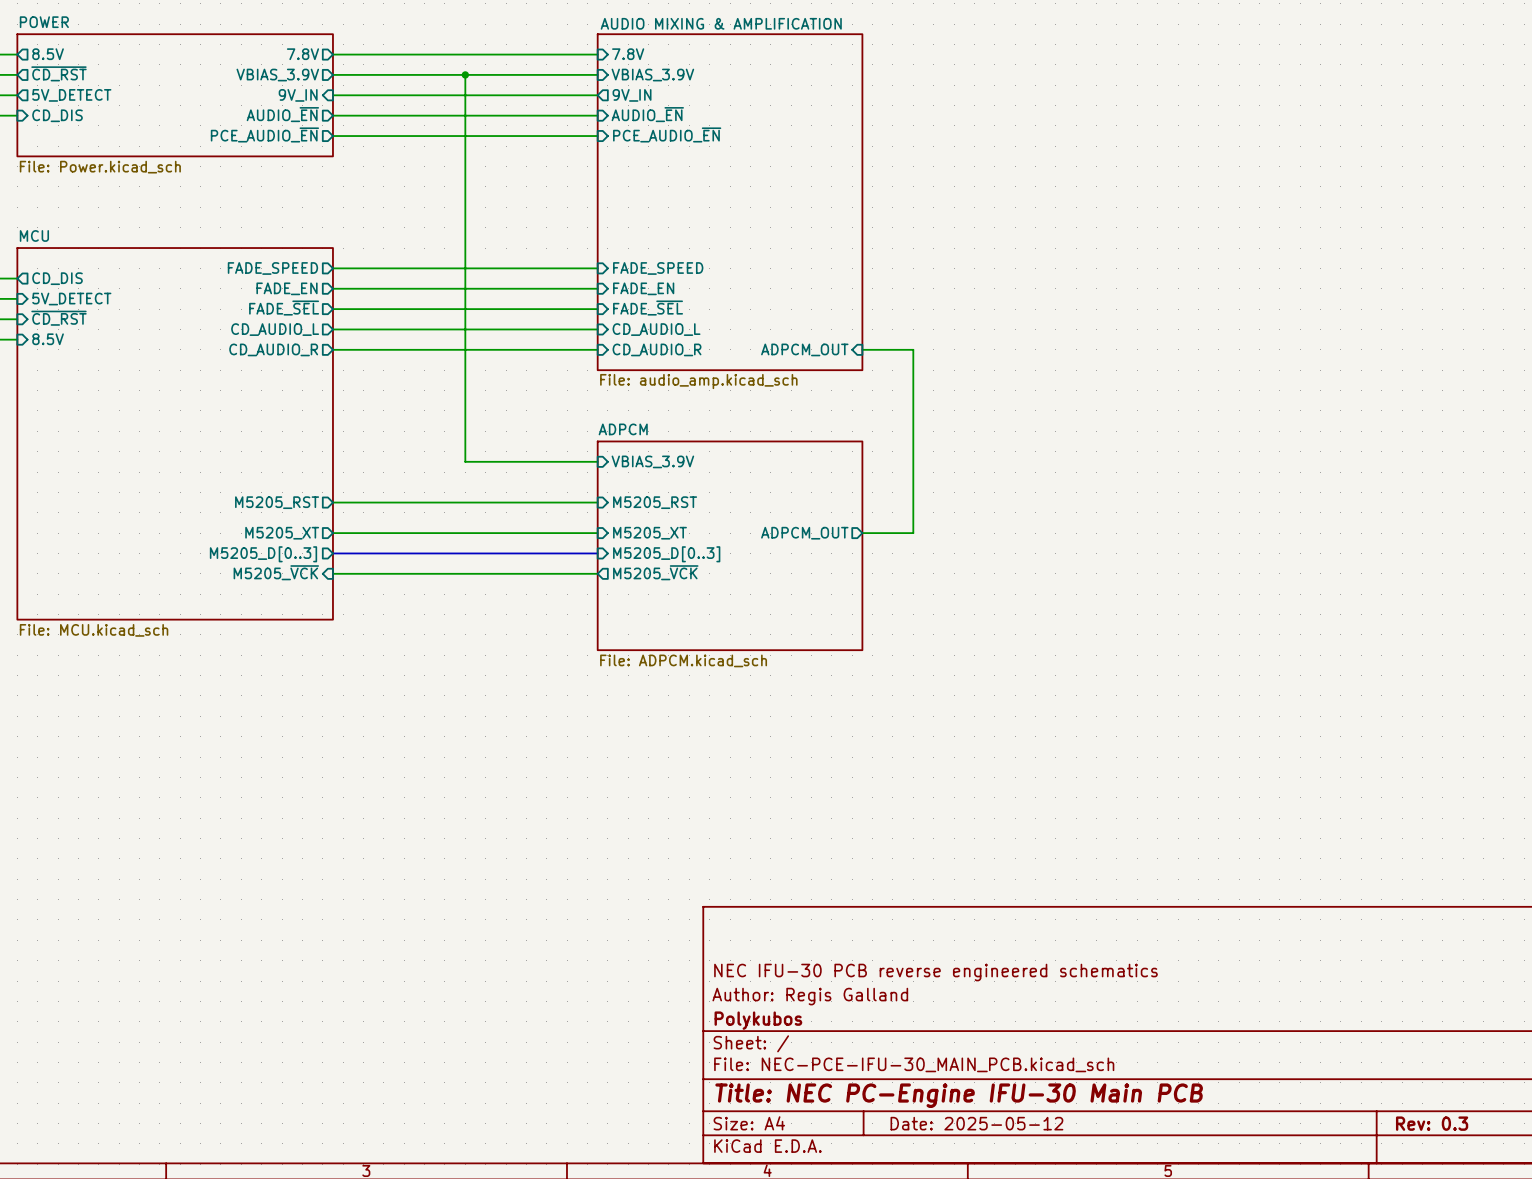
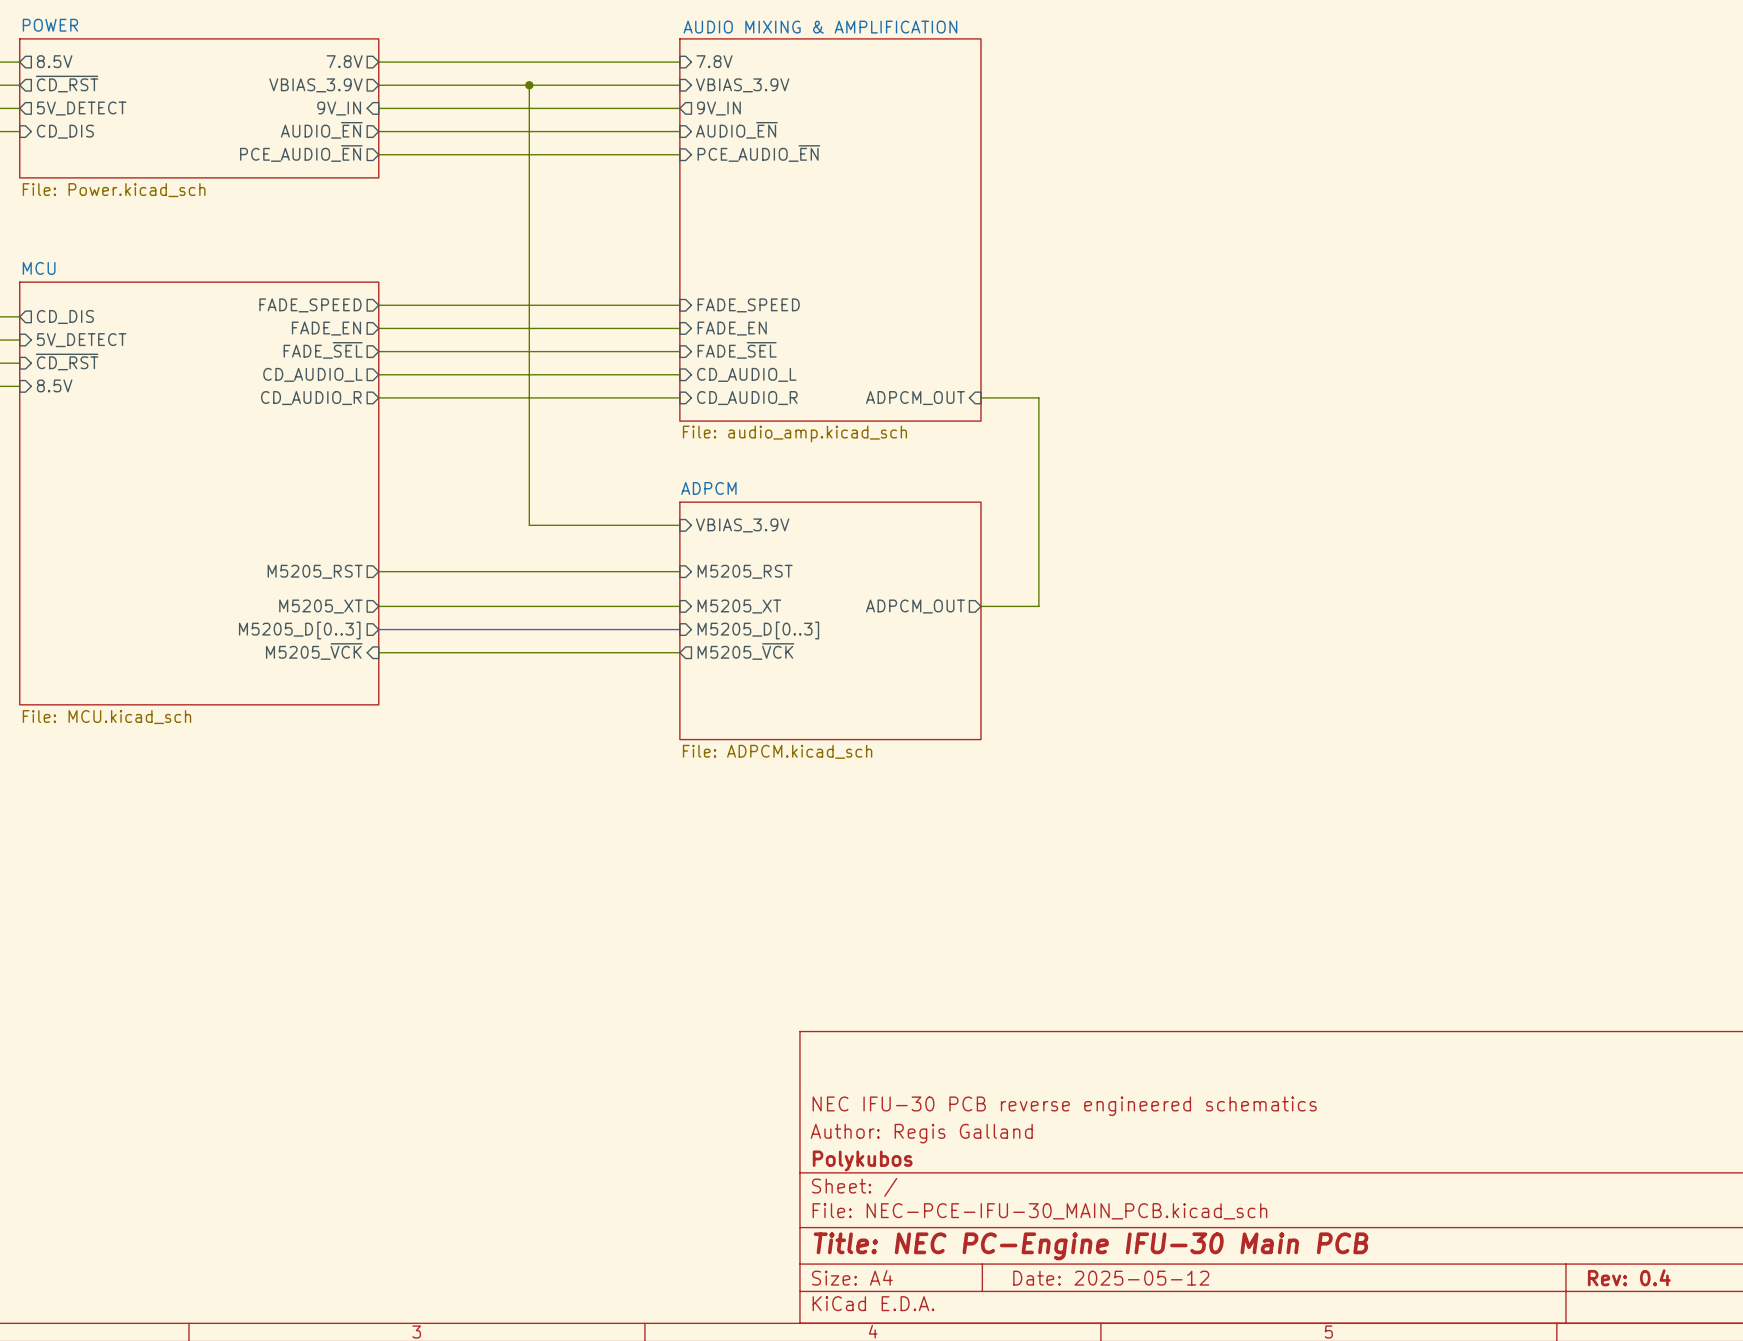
title block: Rev: 0.3 (1432, 1123) -> Rev: 0.4 (1629, 1277)

